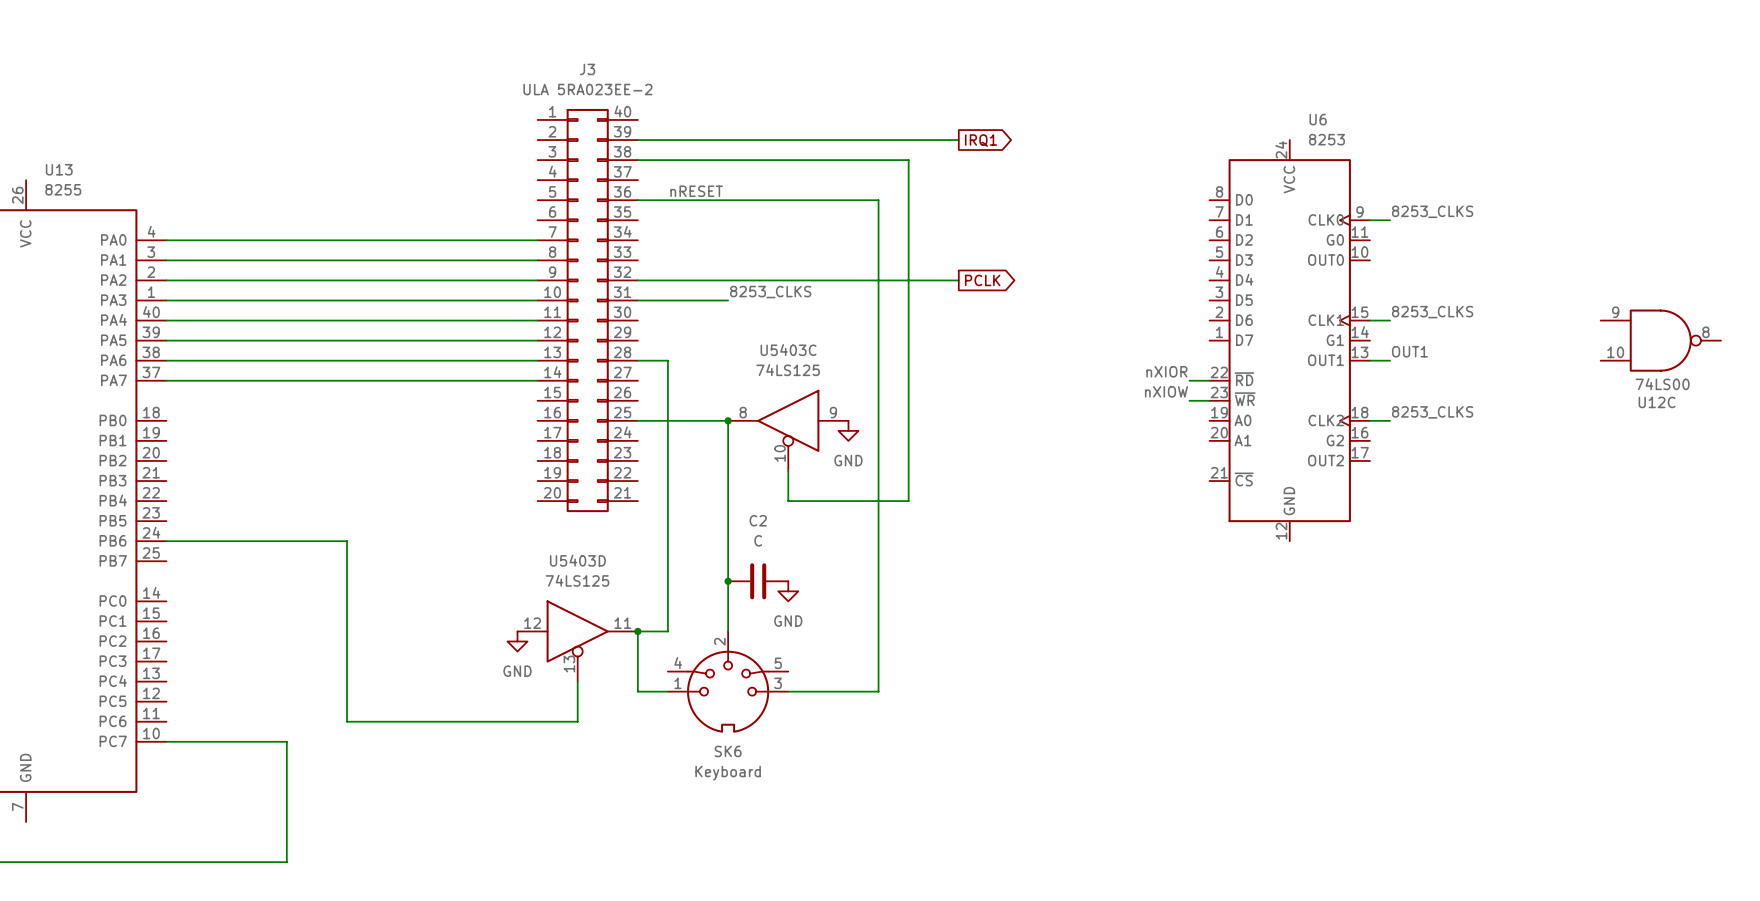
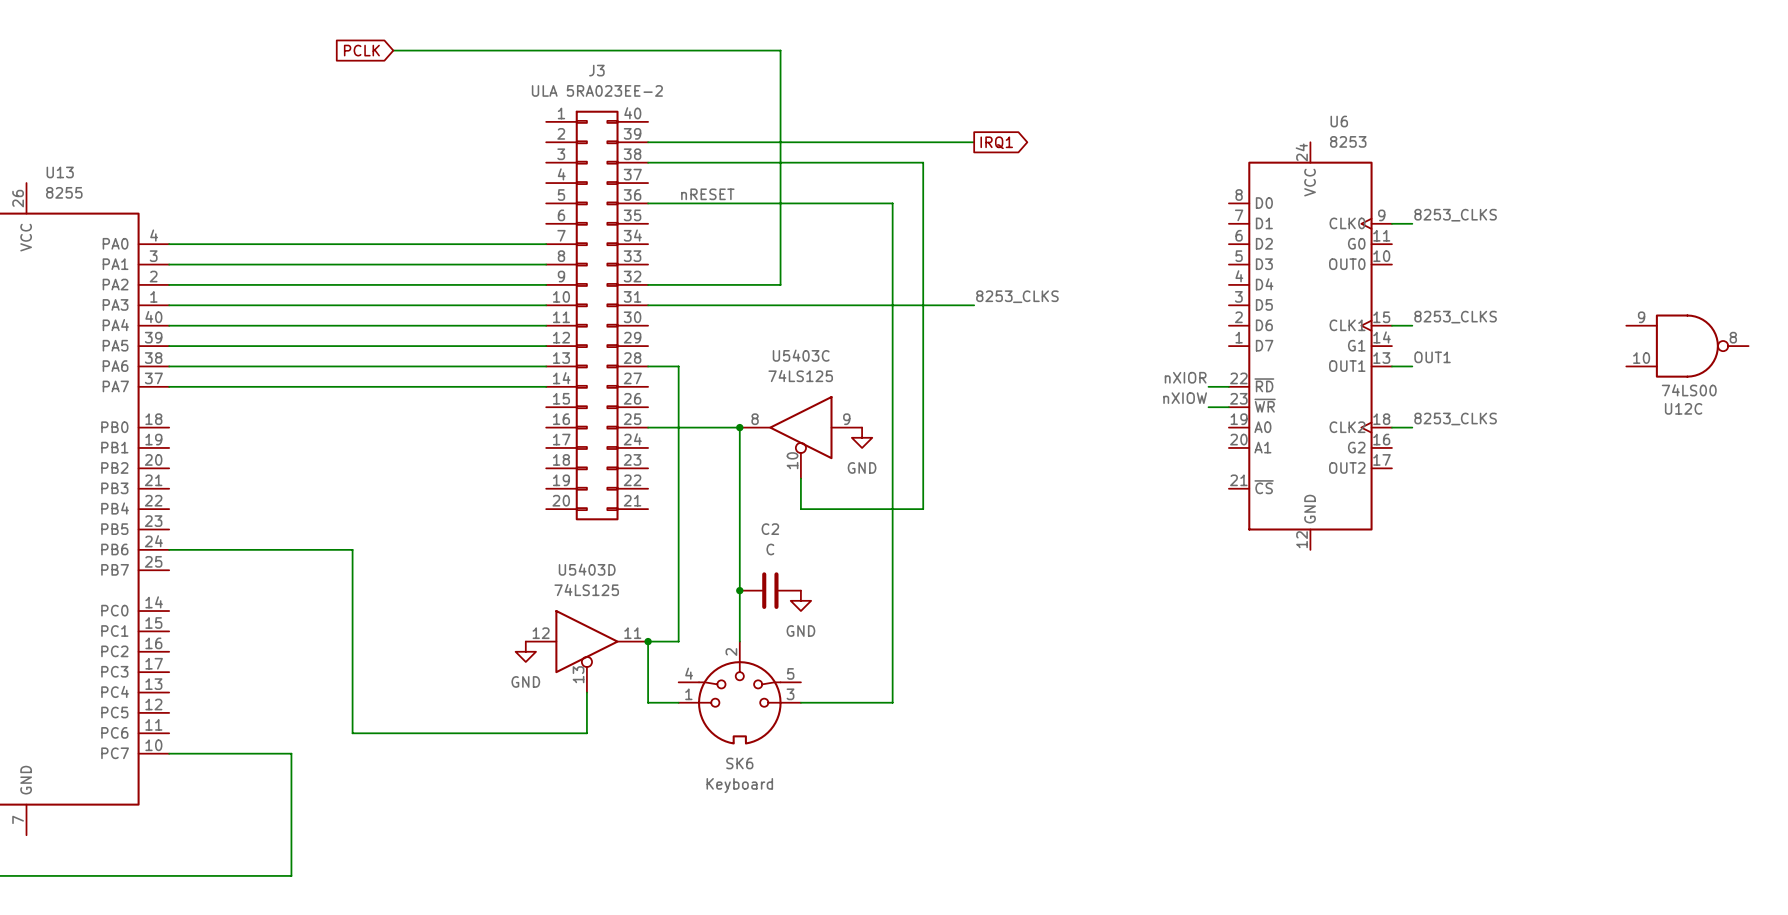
global label: none -> PCLK (361, 50)
wire: (768, 280) (958, 280) -> (780, 284) (780, 50) (393, 50)
global label: PCLK (982, 280) -> none
label: 8253_CLKS (770, 292) -> none
label: none -> 8253_CLKS (1017, 296)
wire: none -> (739, 305) (974, 305)

